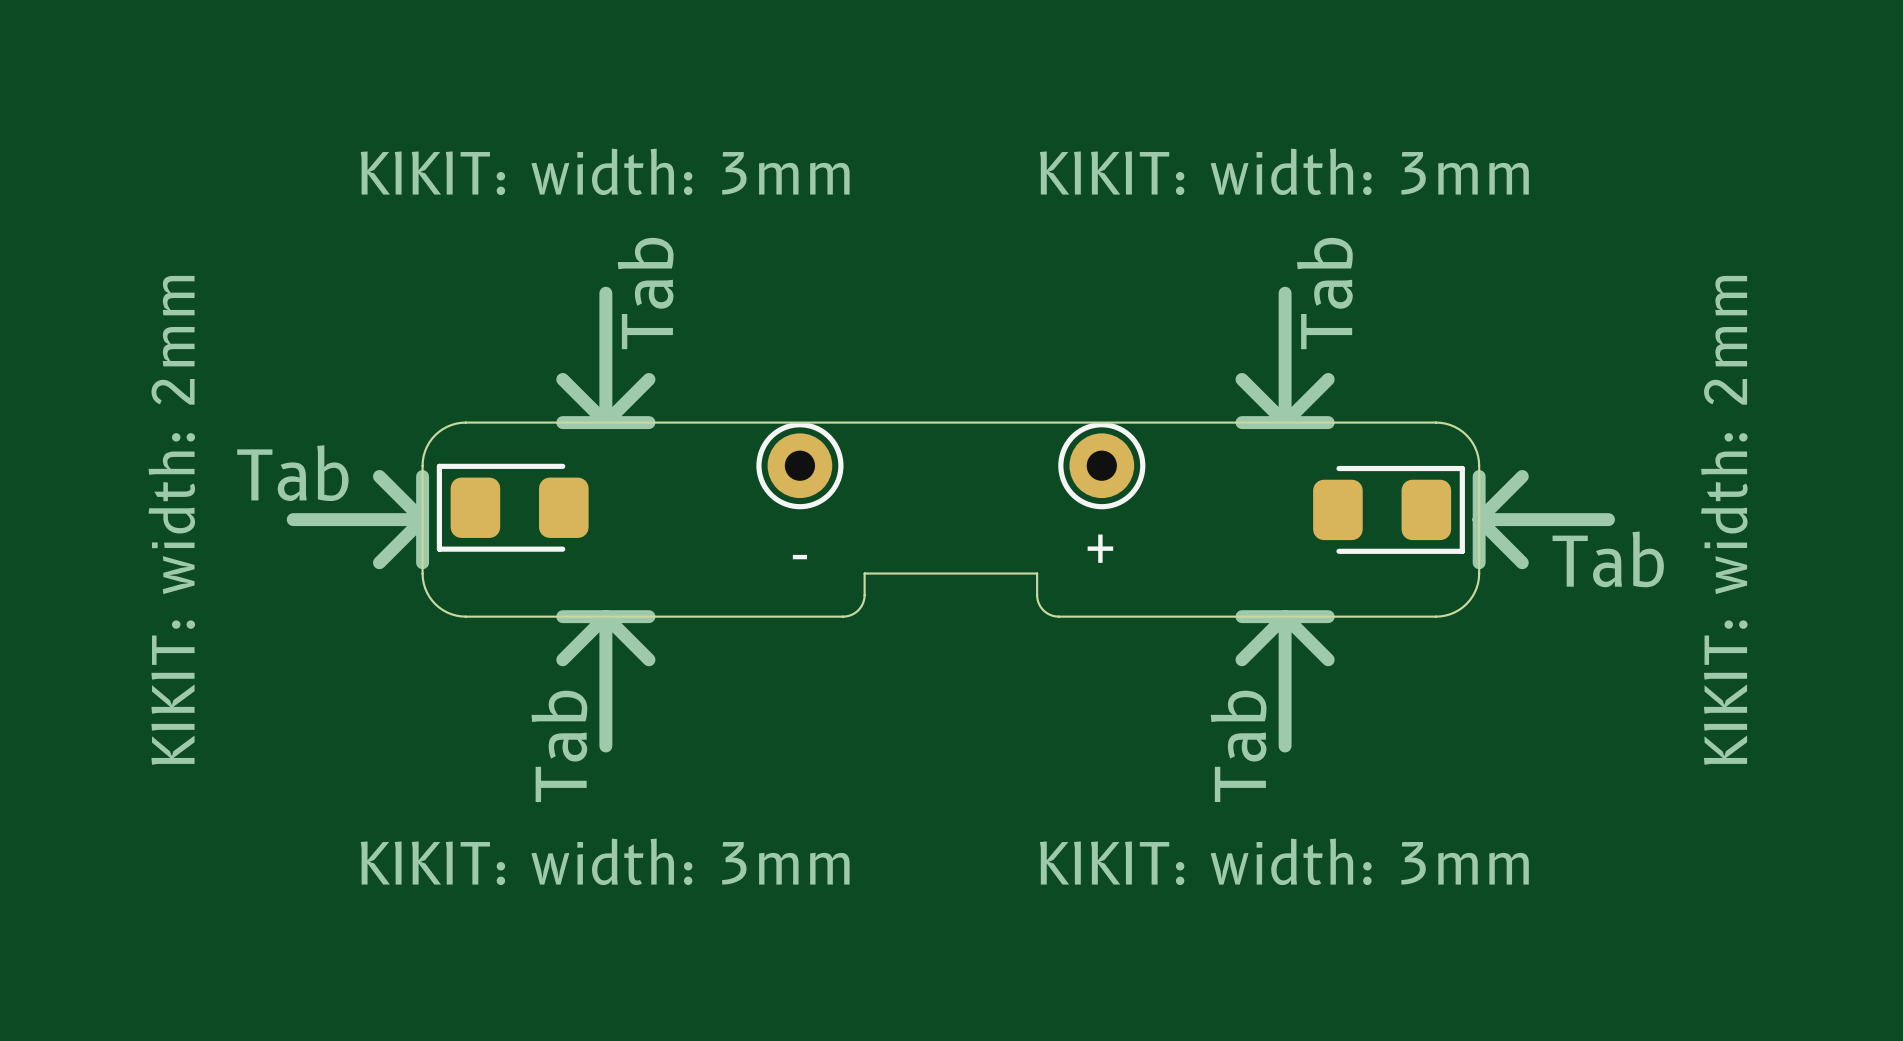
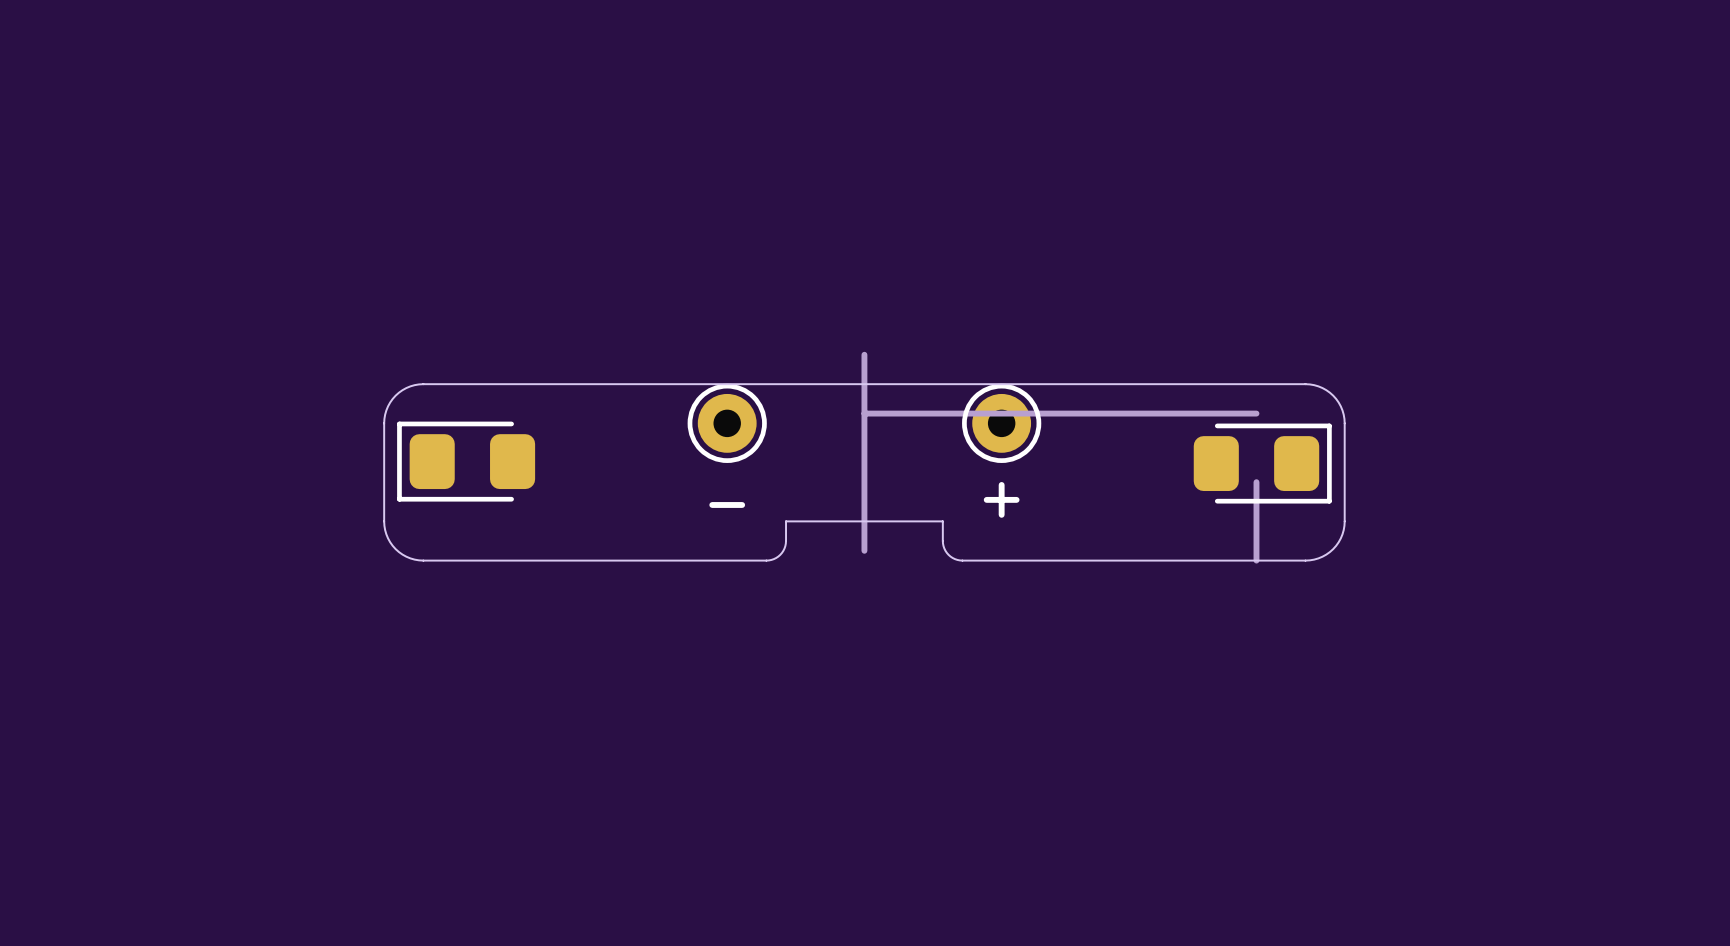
drawing: [286, 286, 1616, 753] -> none
line: none -> (864, 354) (864, 550)
line: none -> (864, 413) (1256, 413)
line: none -> (1256, 482) (1256, 560)

